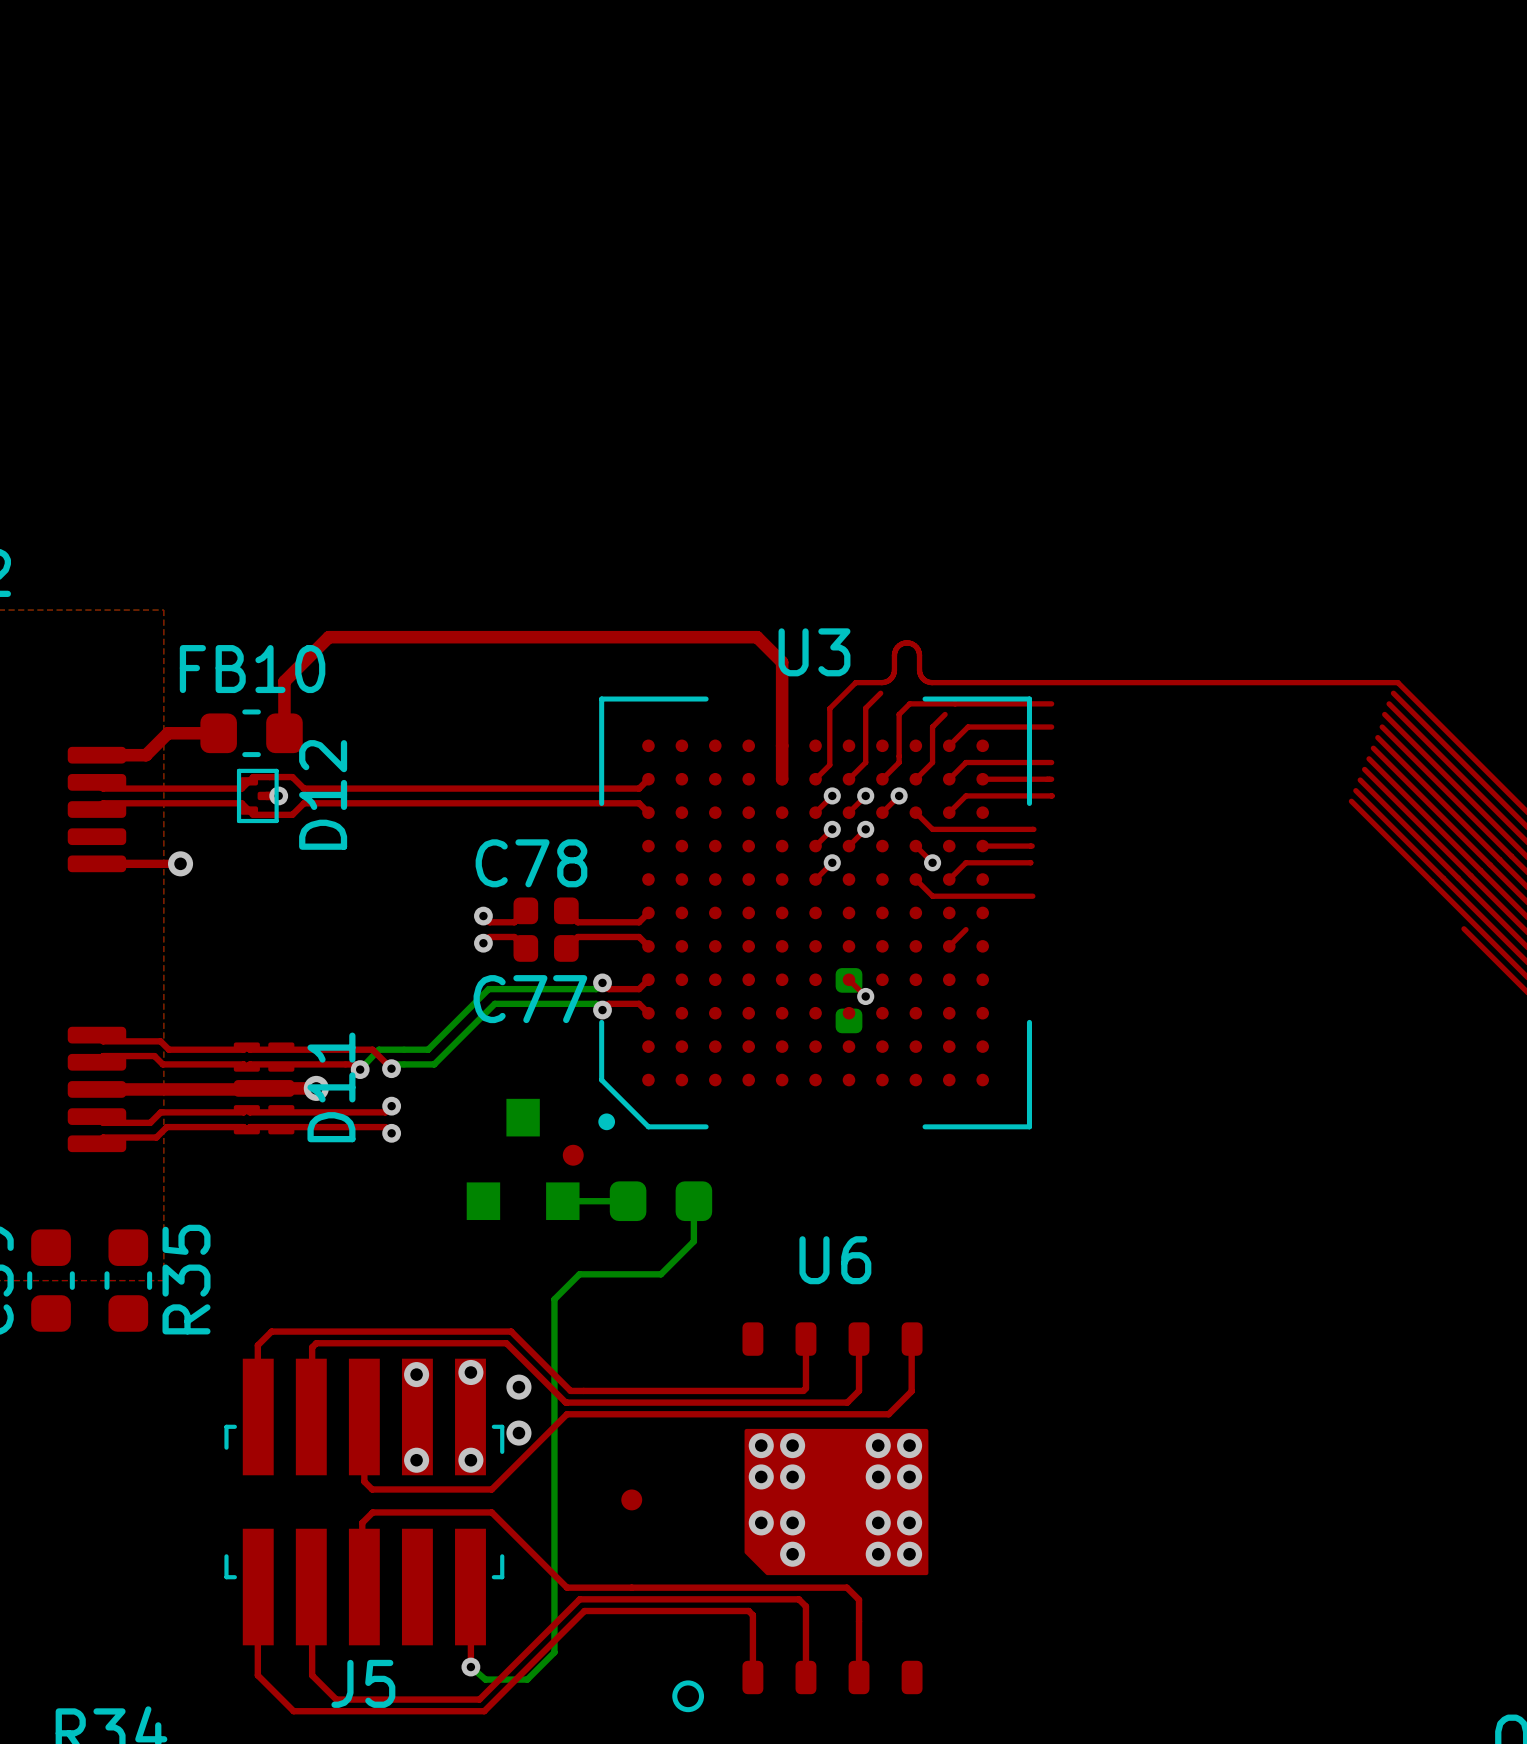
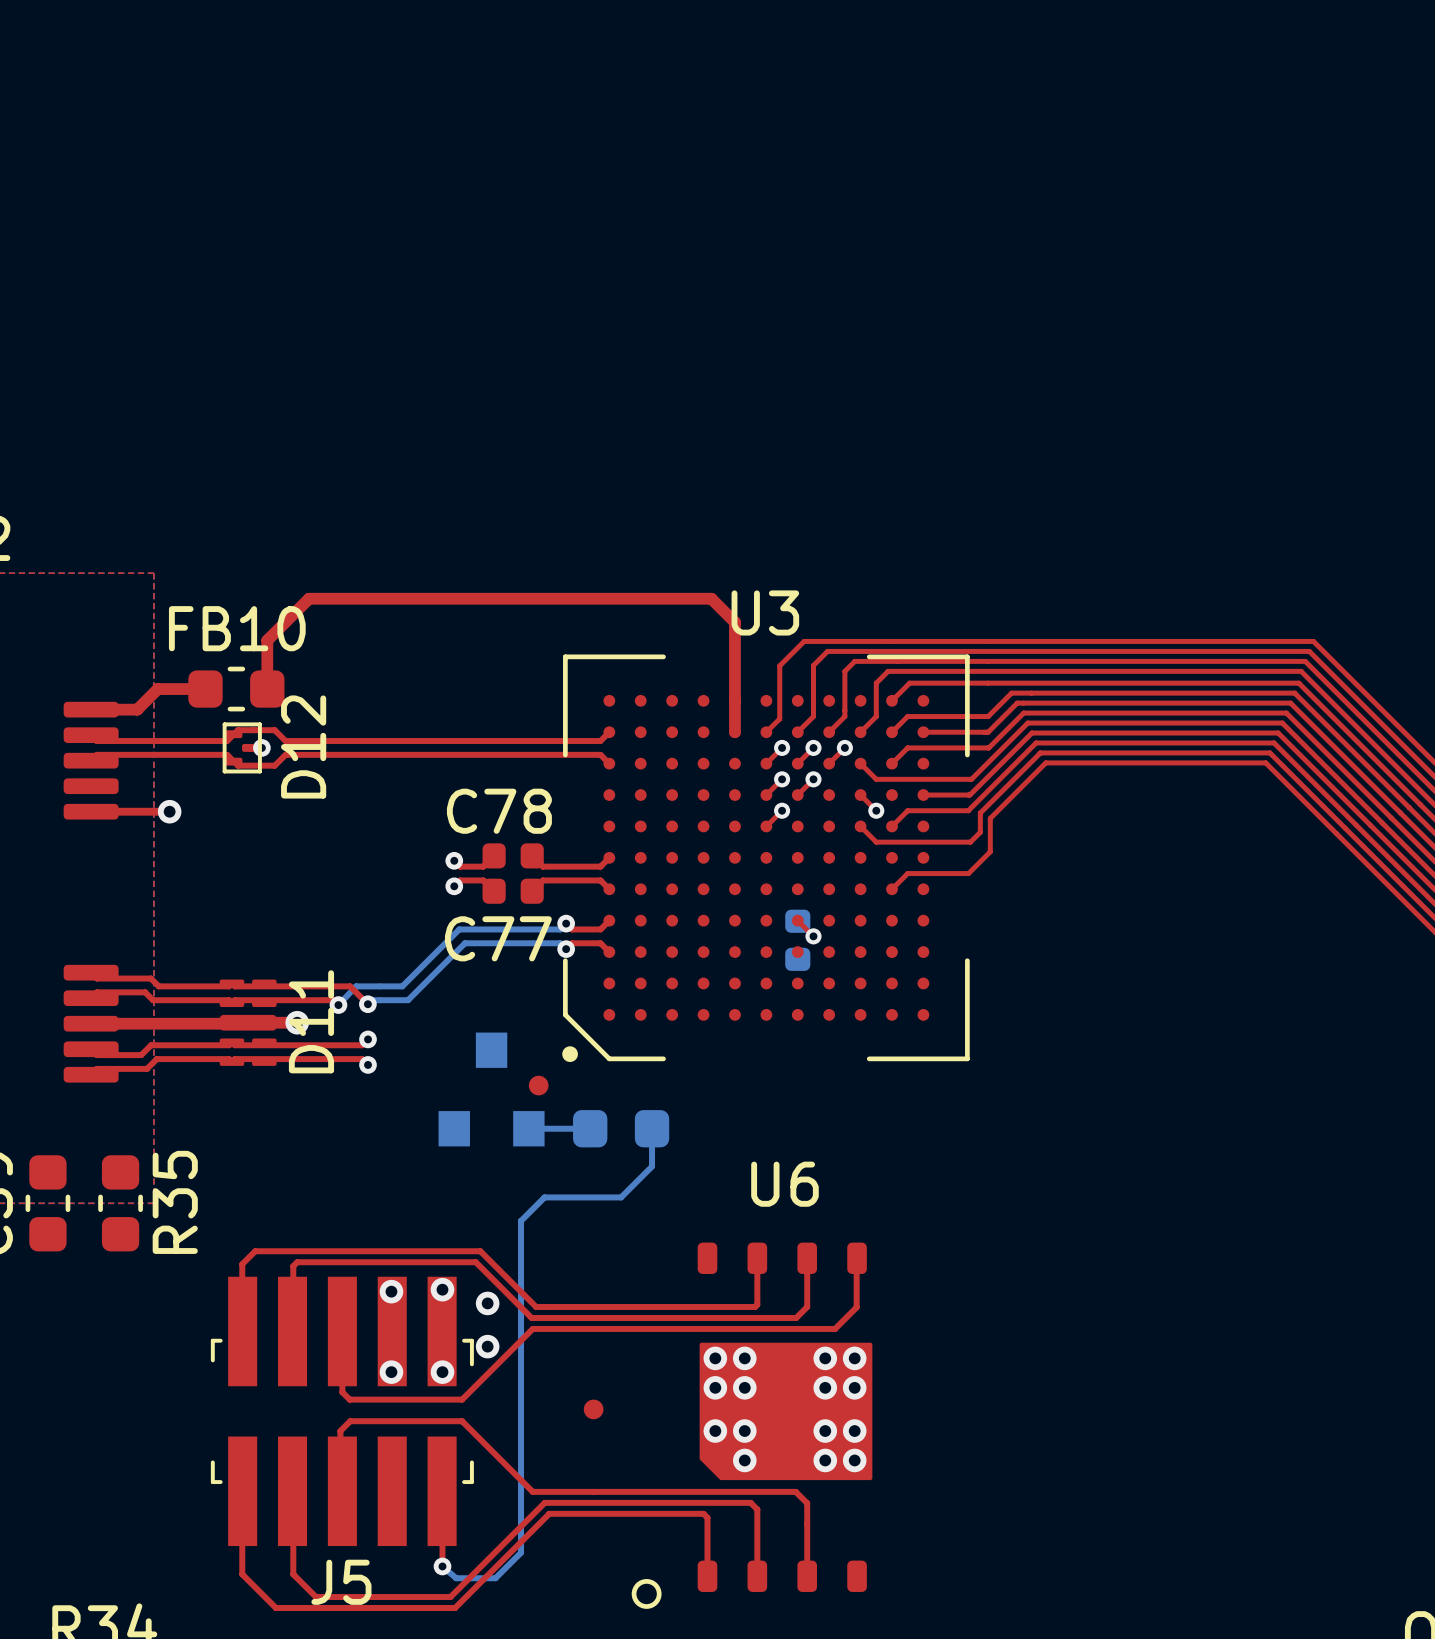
top track: (881, 682) (887, 681) (893, 675) (894, 652) (897, 647) (906, 642) (912, 644) (918, 649) (919, 672) (922, 677) (932, 682) -> (828, 641) (875, 641)
top track: none -> (827, 651) (1309, 651)
top track: none -> (988, 661) (1305, 661)
top track: none -> (888, 671) (1301, 671)
top track: none -> (988, 683) (1298, 683)
top track: none -> (1294, 693) (1011, 693) (988, 716)
top track: none -> (1290, 703) (1017, 703) (988, 732)
top track: none -> (1286, 713) (1023, 713) (988, 747)
top track: none -> (1282, 723) (1027, 723) (971, 779)
top track: none -> (1278, 733) (1031, 733) (969, 795)
top track: none -> (1274, 742) (1036, 742) (968, 810)
top track: none -> (1269, 752) (1040, 752) (980, 813) (980, 832) (970, 842)
top track: none -> (1375, 872) (1265, 762) (1045, 762) (990, 818) (990, 851) (968, 873) (907, 873)

